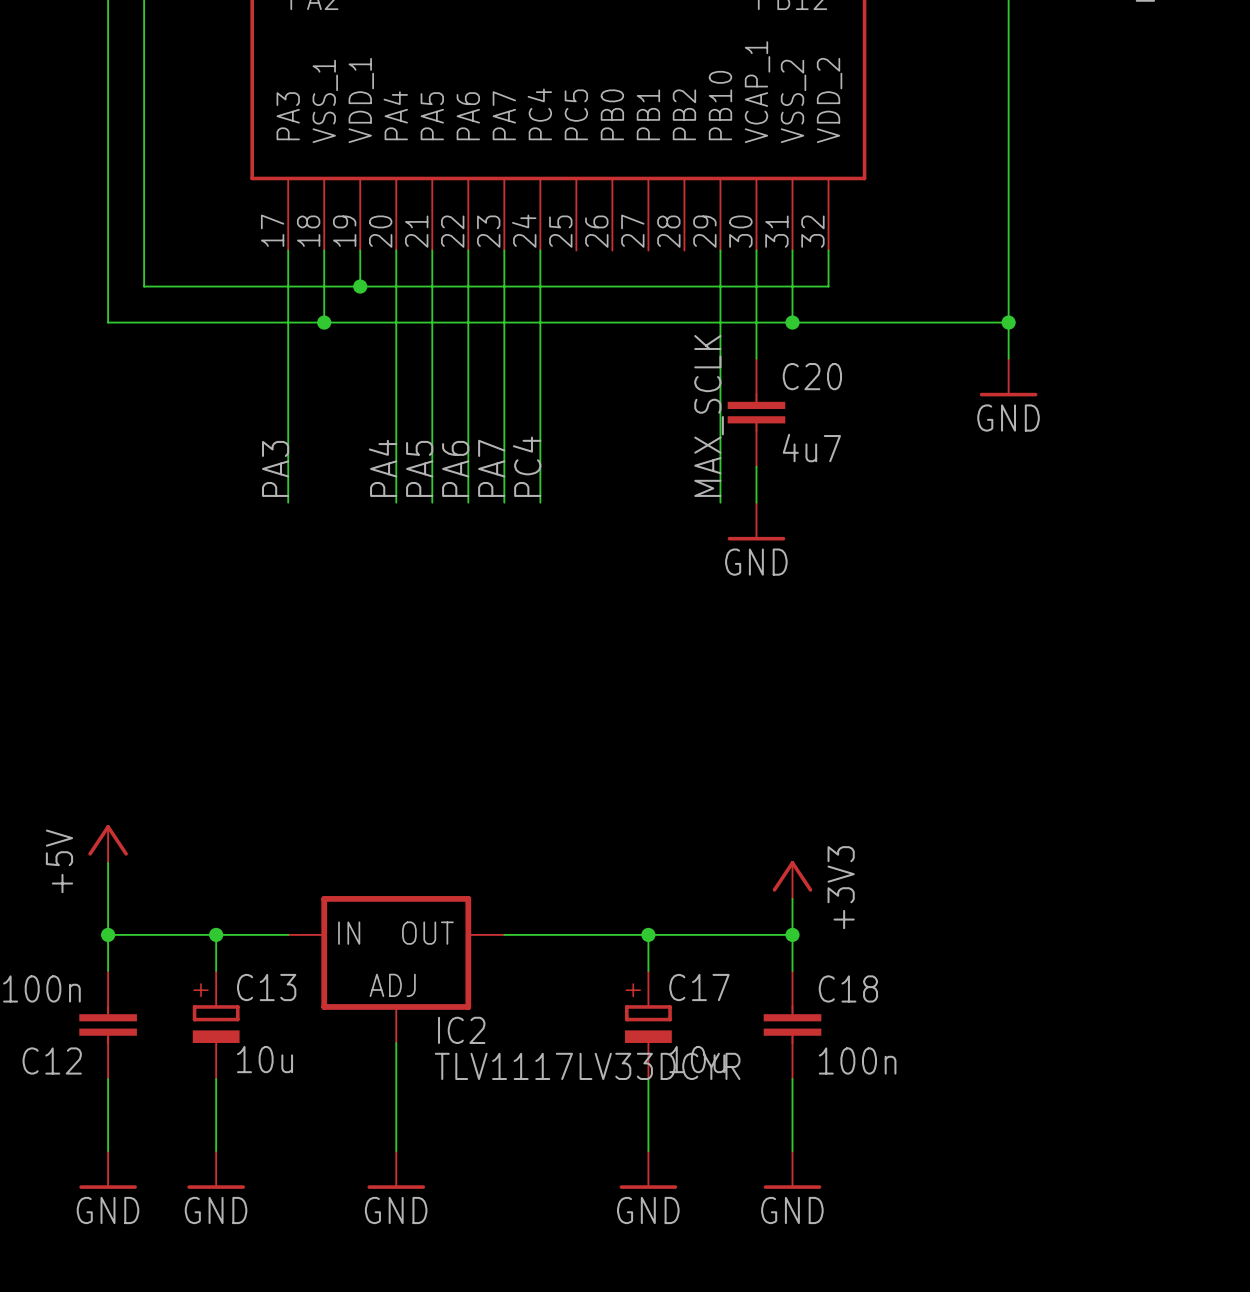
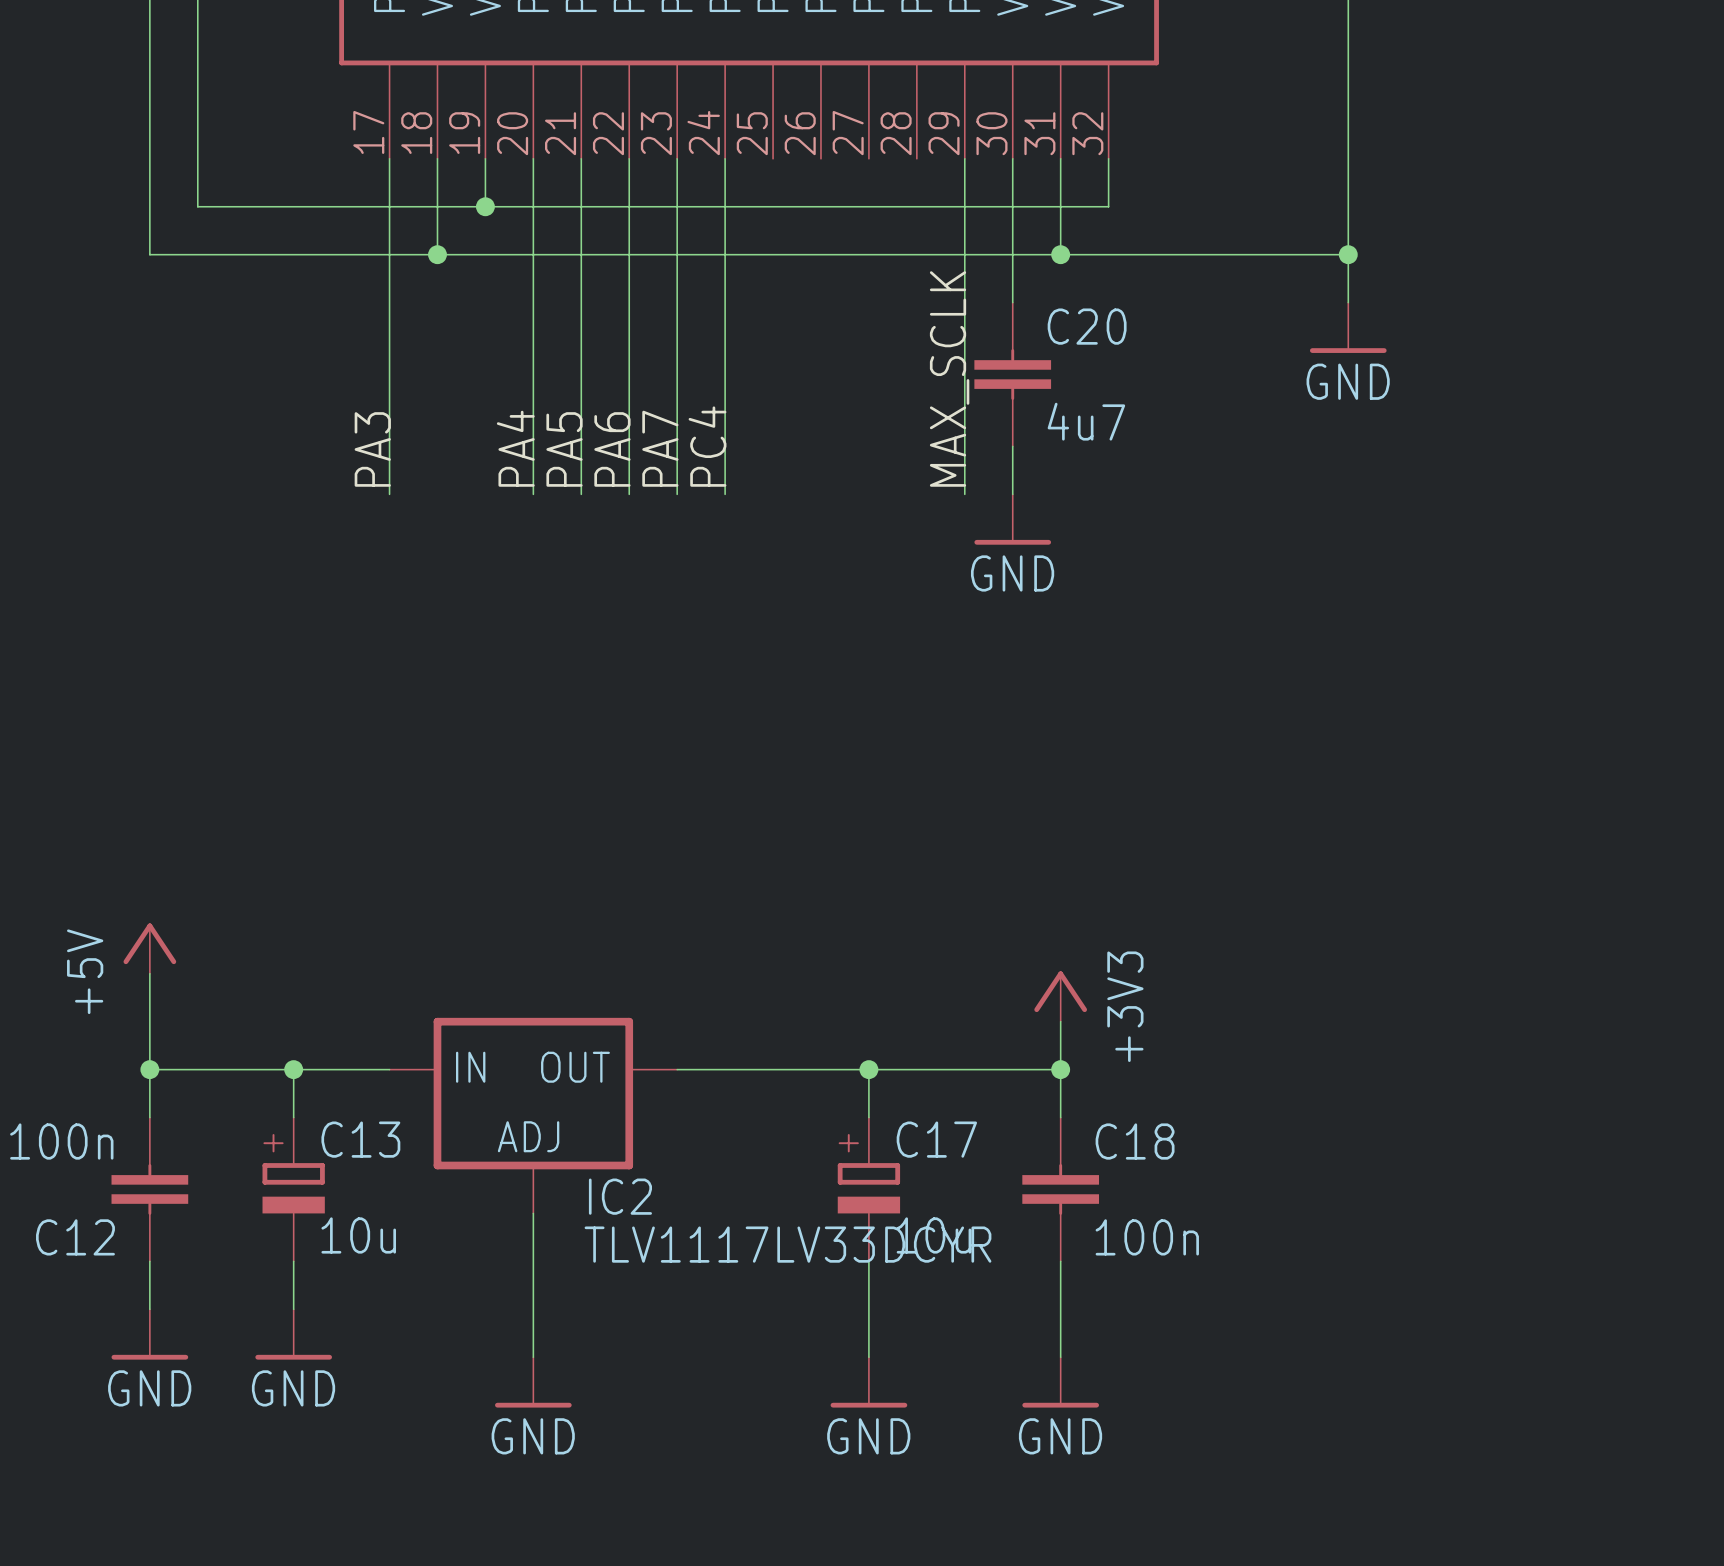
power symbol position: GND (108, 1169) -> GND (149, 1334)
power symbol position: GND (216, 1169) -> GND (293, 1334)

